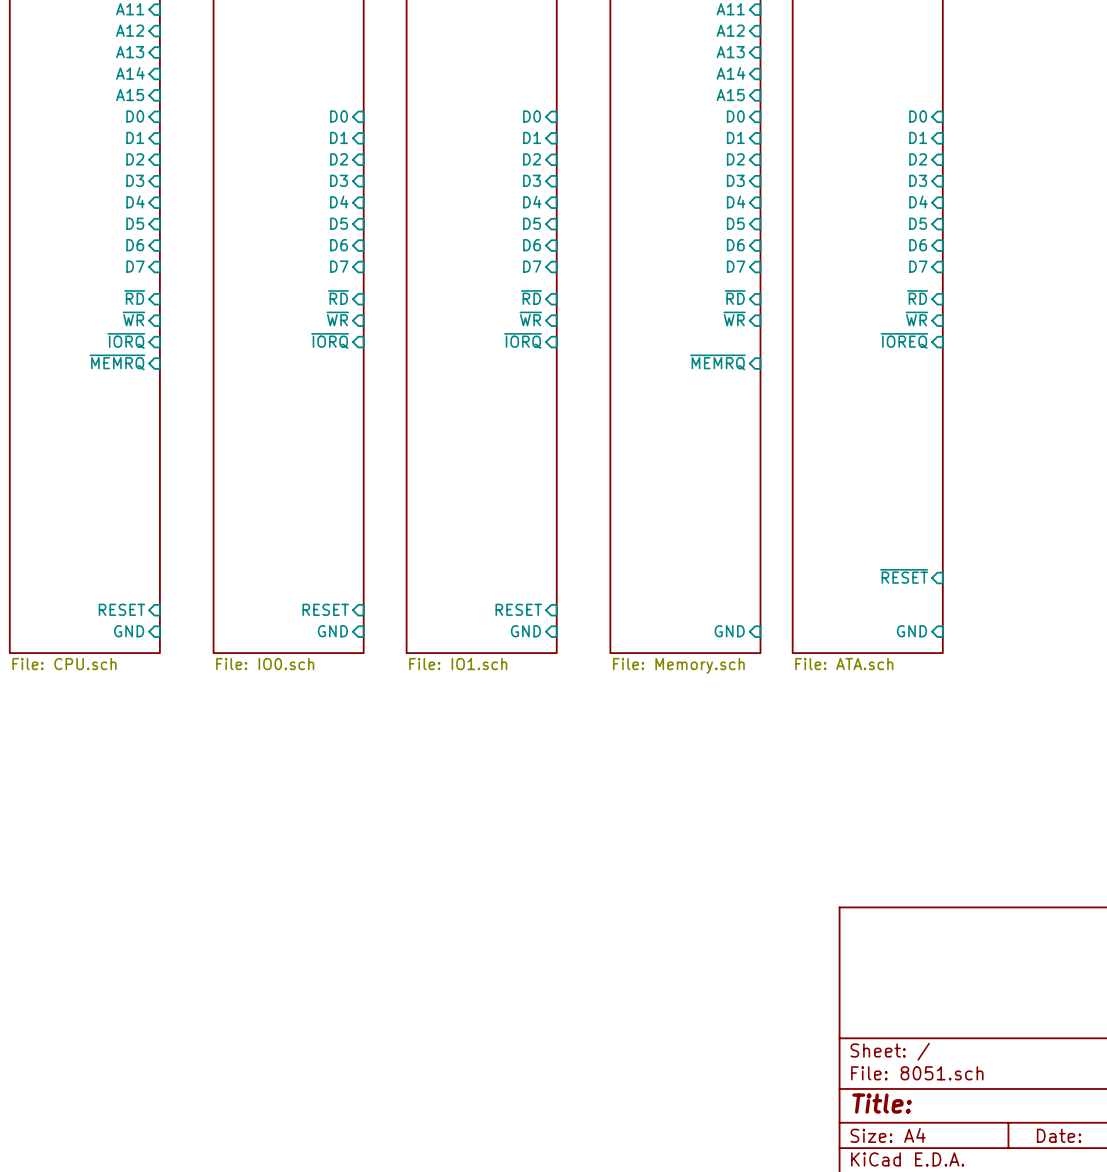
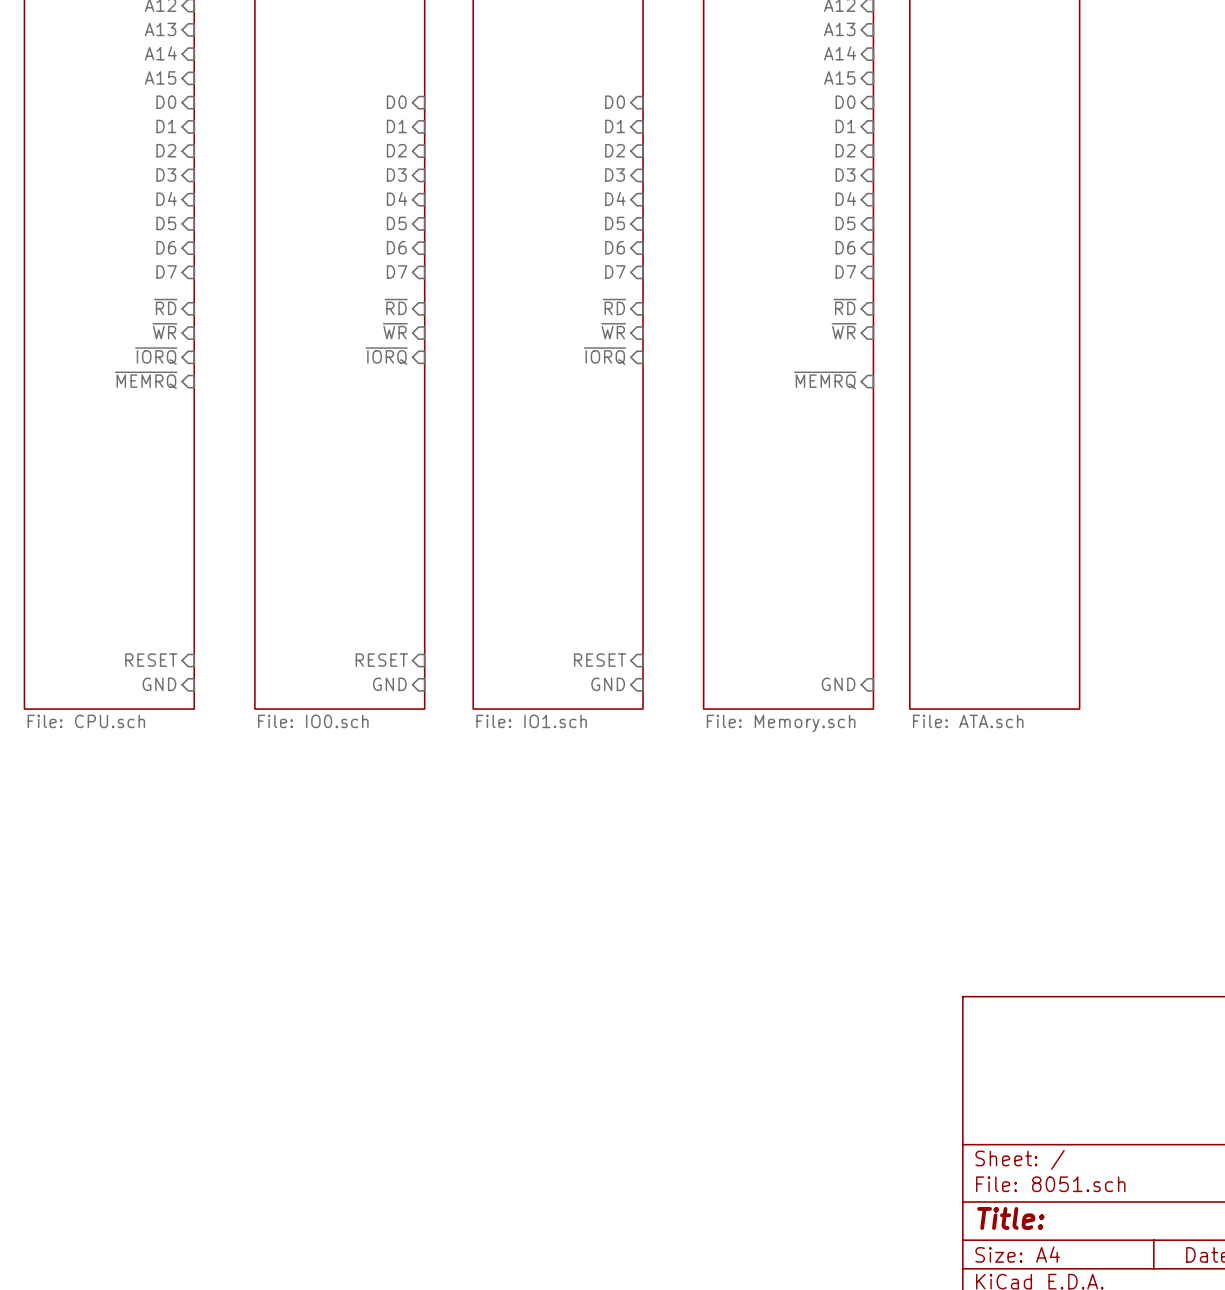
sheet pin: D0 (918, 116) -> none
sheet pin: D1 (918, 137) -> none
sheet pin: D2 (918, 159) -> none
sheet pin: D3 (918, 180) -> none
sheet pin: D4 (918, 202) -> none
sheet pin: D5 (918, 223) -> none
sheet pin: D6 (918, 245) -> none
sheet pin: D7 (918, 266) -> none
sheet pin: ~{RD} (917, 297) -> none
sheet pin: ~{WR} (916, 319) -> none
sheet pin: ~{IOREQ} (904, 340) -> none
sheet pin: ~{RESET} (904, 576) -> none
sheet pin: GND (912, 631) -> none

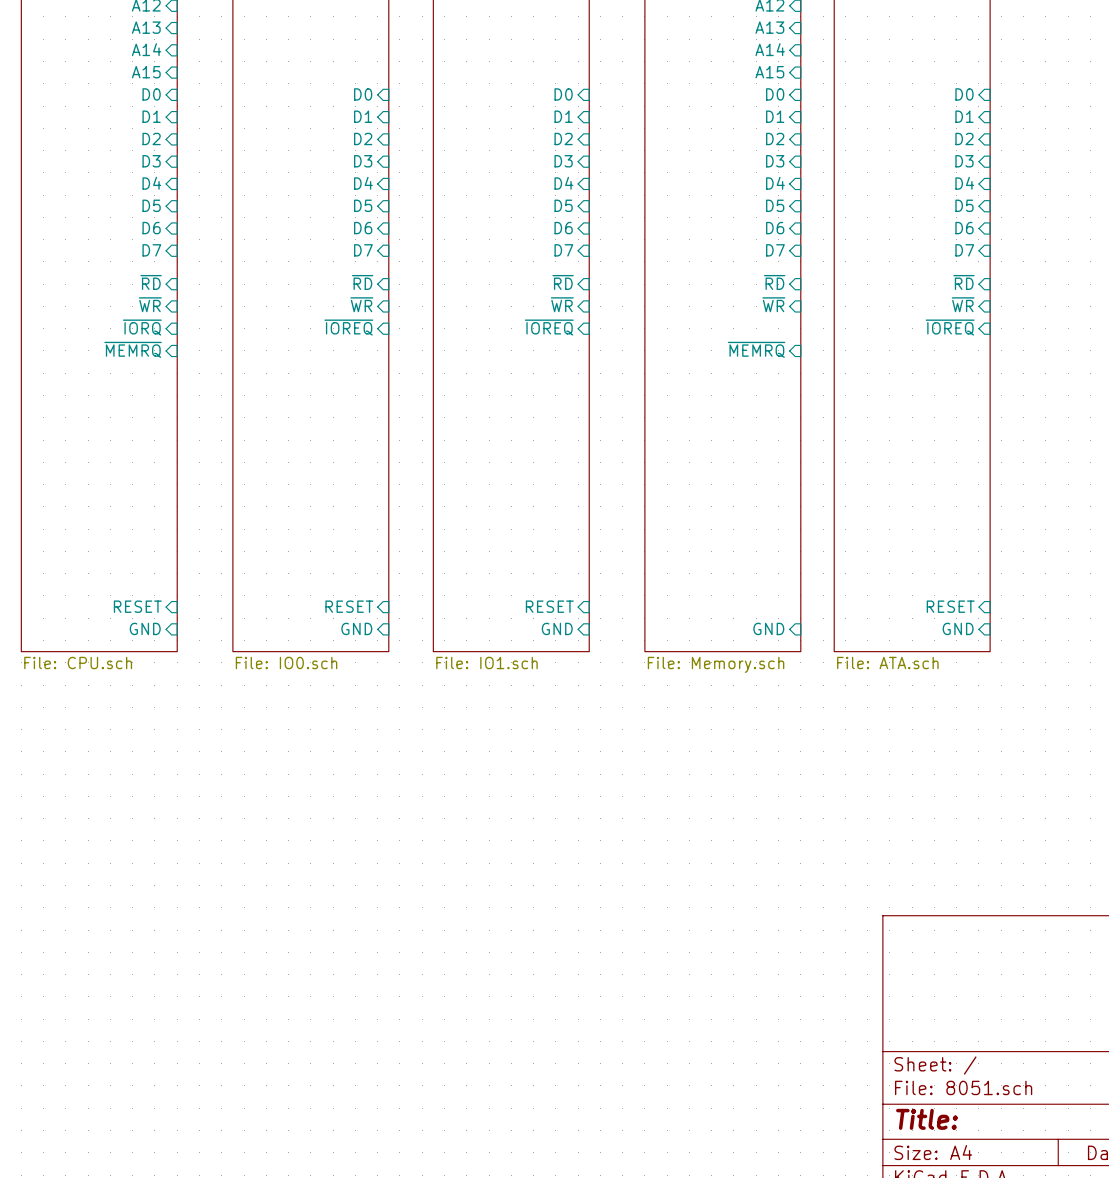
sheet pin: none -> D0 (964, 94)
sheet pin: none -> D1 (964, 116)
sheet pin: none -> D2 (964, 138)
sheet pin: none -> D3 (964, 161)
sheet pin: none -> D4 (964, 183)
sheet pin: none -> D5 (964, 205)
sheet pin: none -> D6 (964, 228)
sheet pin: none -> D7 (964, 250)
sheet pin: none -> ~{RD} (963, 282)
sheet pin: none -> ~{WR} (963, 304)
sheet pin: ~{IORQ} (386, 356) -> ~{IOREQ} (348, 327)
sheet pin: ~{IORQ} (604, 356) -> ~{IOREQ} (549, 327)
sheet pin: none -> ~{IOREQ} (950, 327)
sheet pin: none -> RESET (950, 606)
sheet pin: none -> GND (958, 628)

